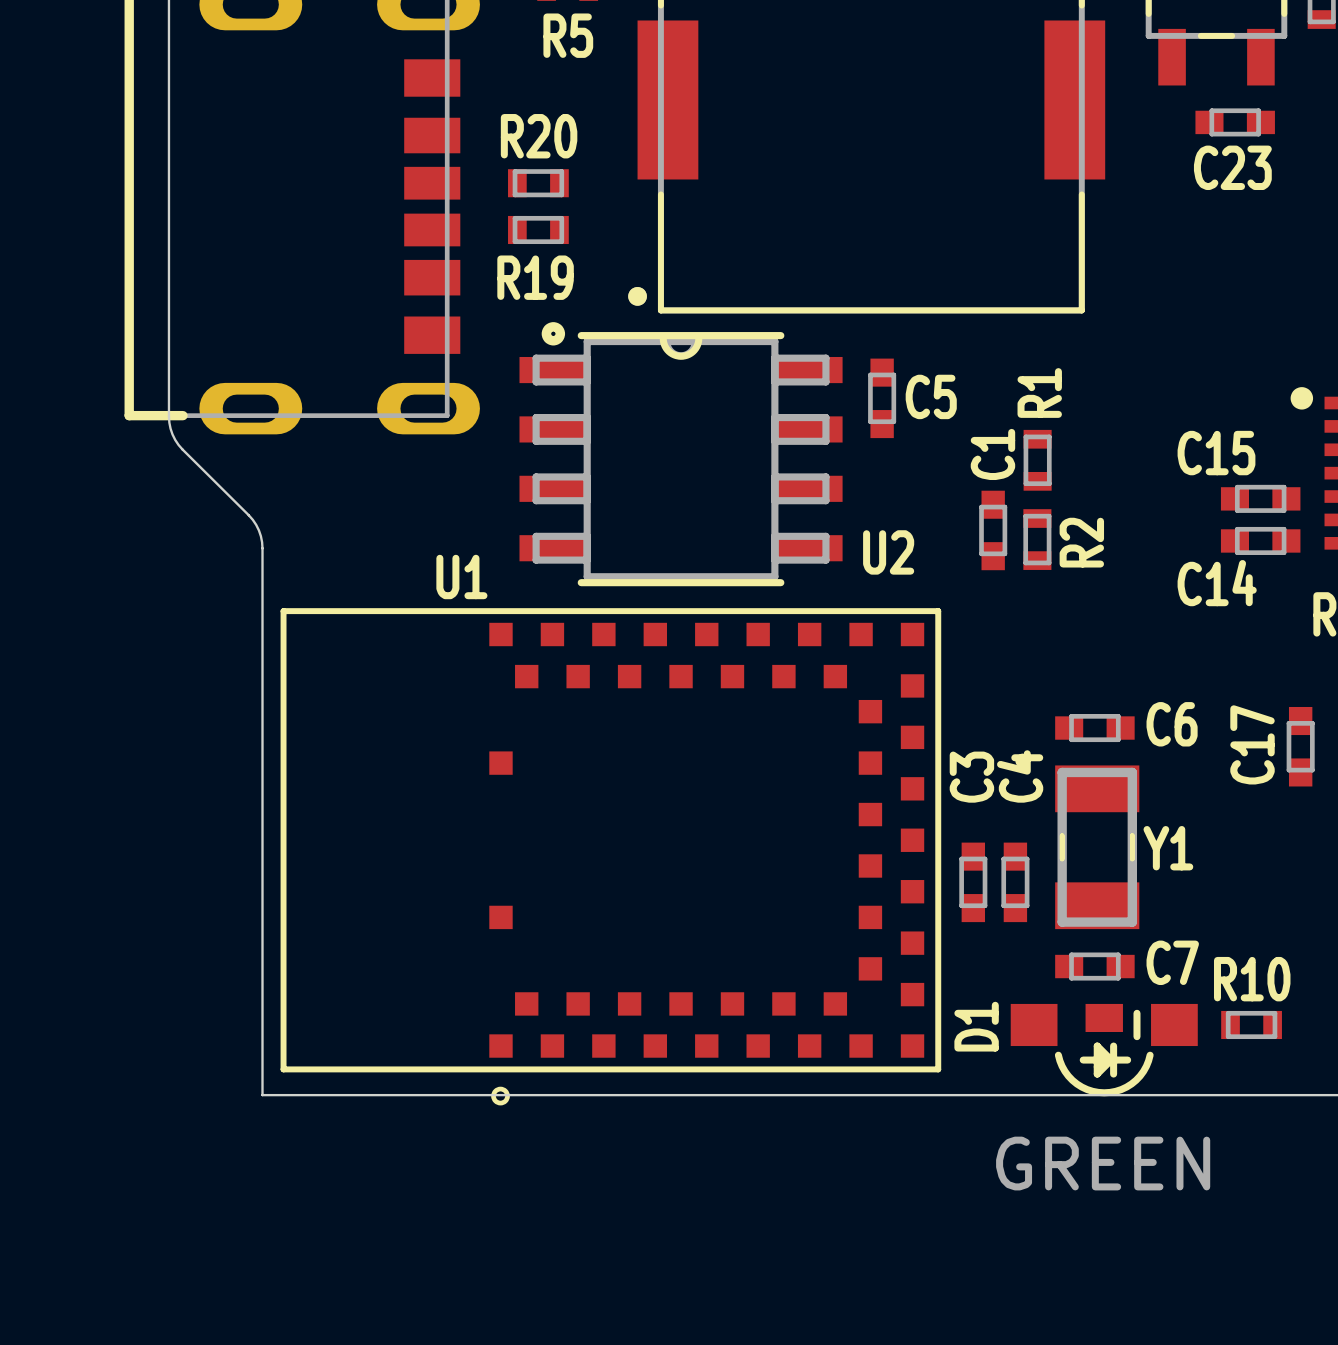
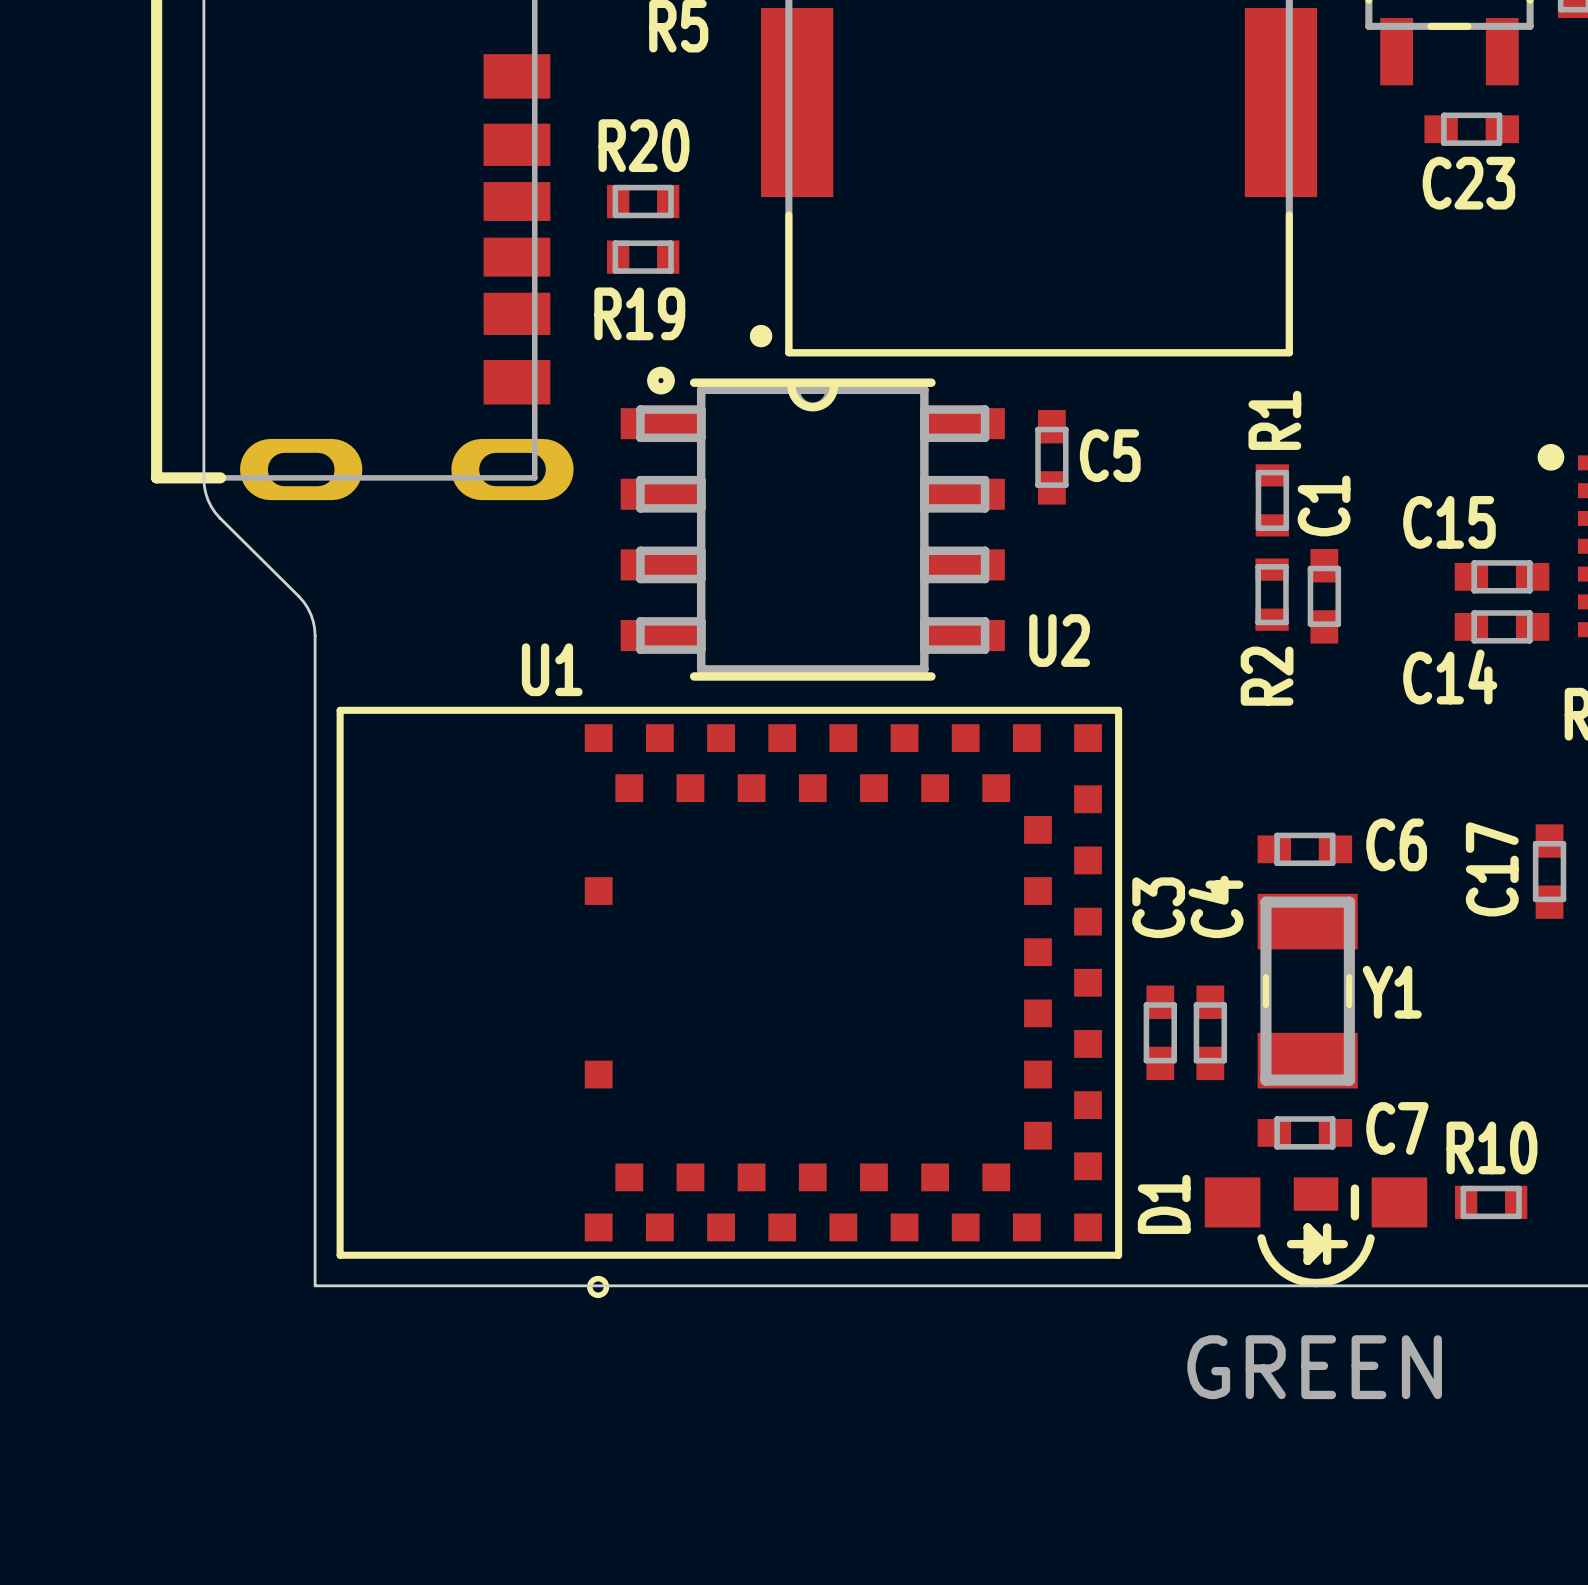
R1 position: (1037, 460) -> (1272, 500)
C1 position: (993, 530) -> (1324, 596)
R2 position: (1037, 539) -> (1272, 594)
R2 name position: R2 (1081, 542) -> R2 (1267, 676)

